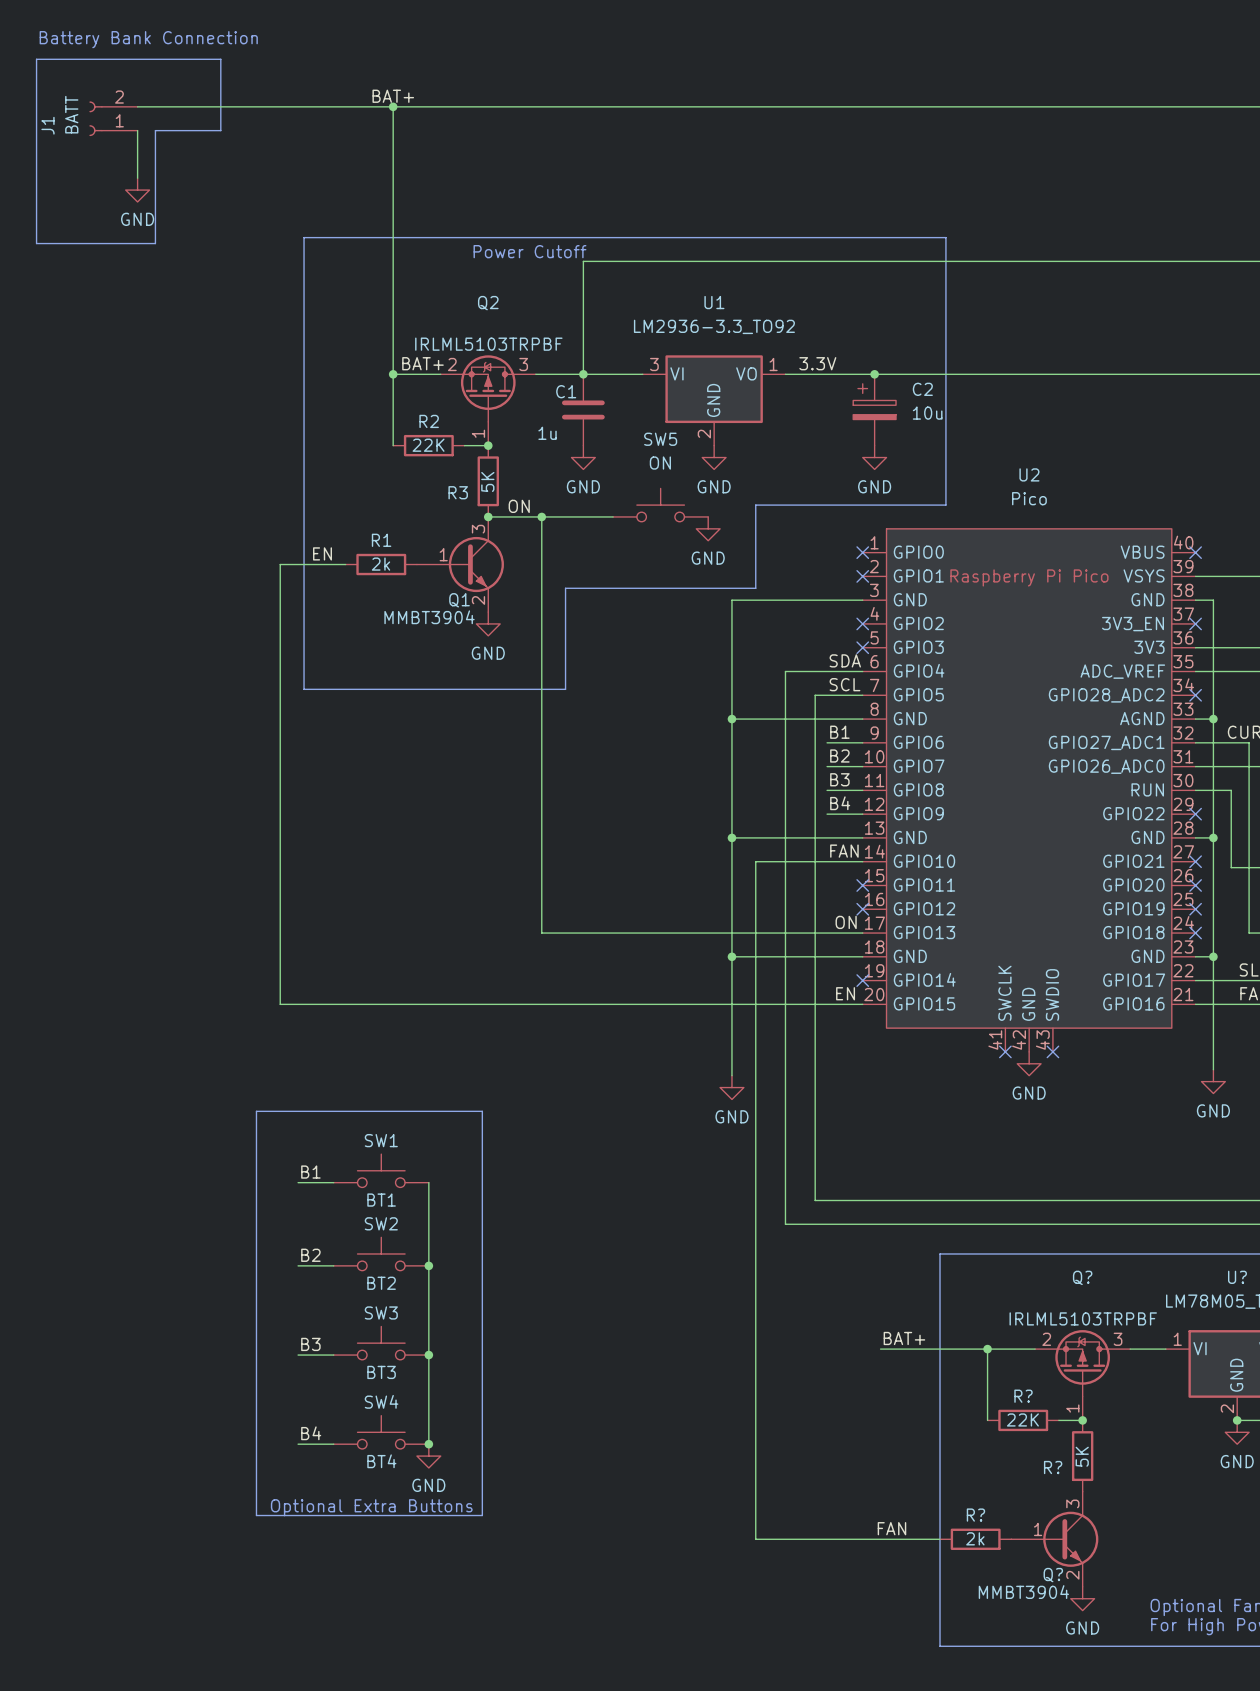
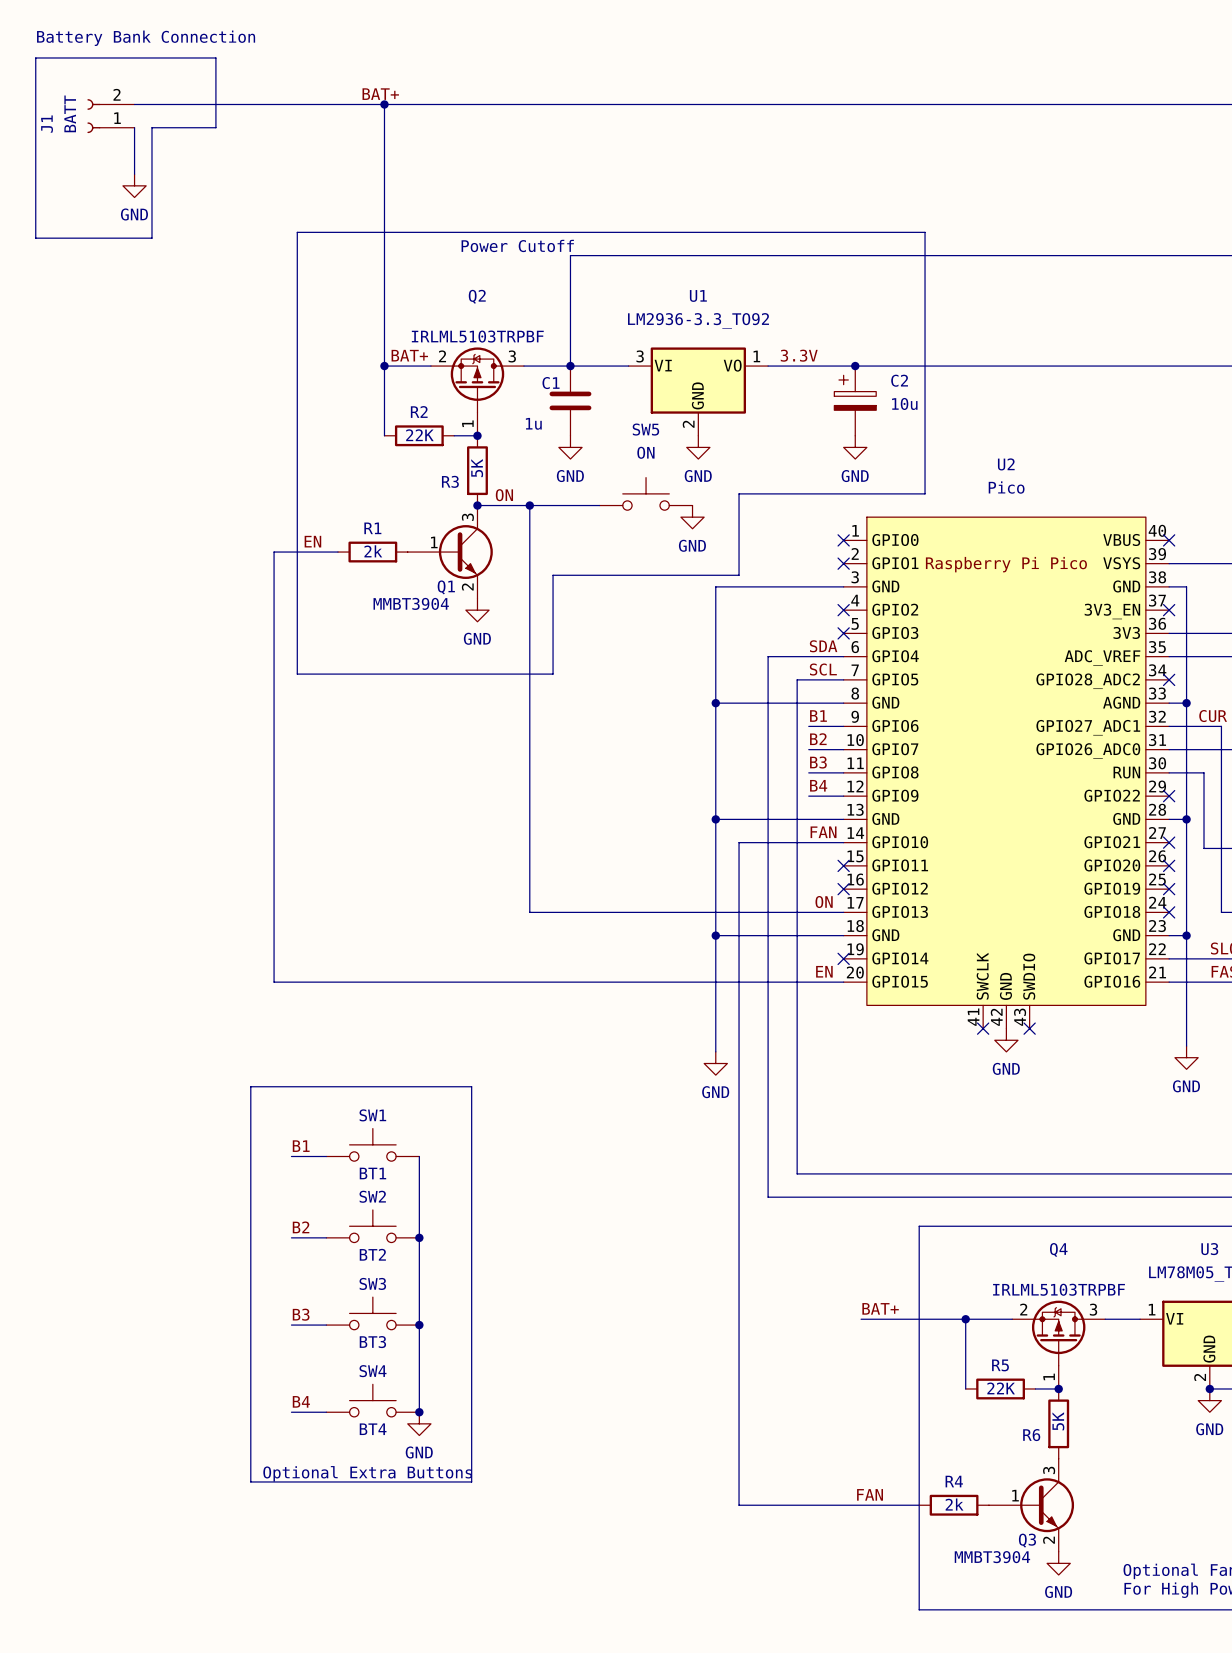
Q? name: Q? (1082, 1277) -> Q4 (1058, 1250)
U? name: U? (1237, 1277) -> U3 (1209, 1249)
R? name: R? (1023, 1396) -> R5 (1000, 1365)
R? name: R? (1053, 1467) -> R6 (1031, 1435)
R? name: R? (975, 1515) -> R4 (954, 1481)
Q? name: Q? (1053, 1575) -> Q3 (1027, 1540)

